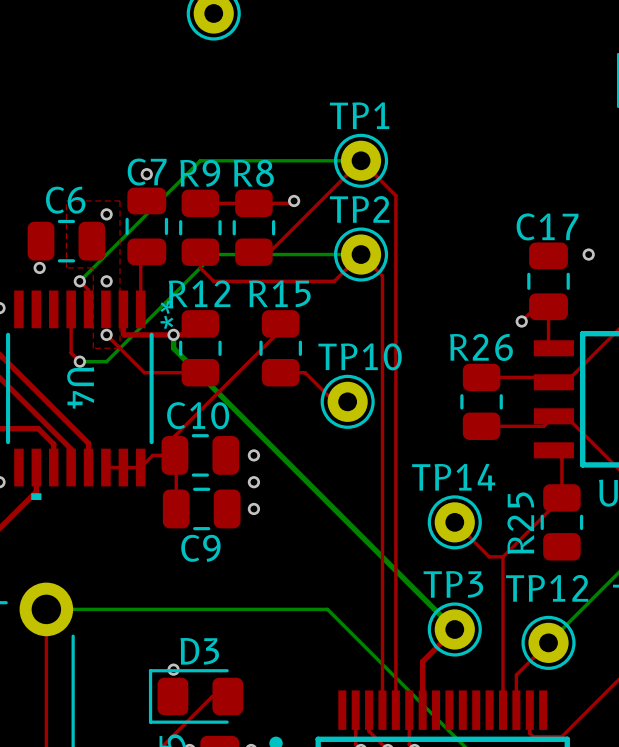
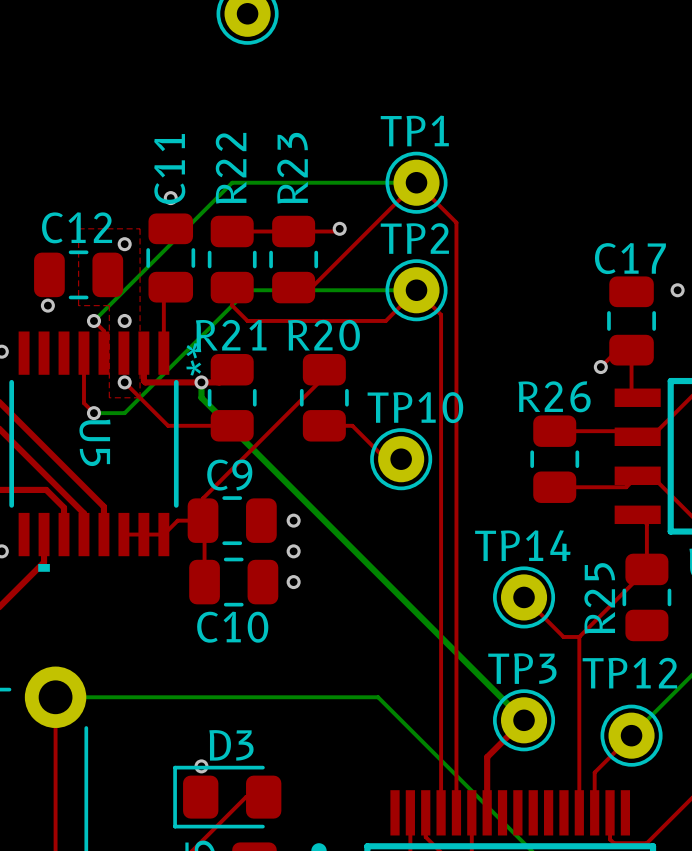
C7 name: C7 (147, 172) -> C11 (169, 169)
R9 name: R9 (200, 173) -> R22 (231, 168)
R8 name: R8 (253, 173) -> R23 (292, 168)
C6 name: C6 (65, 200) -> C12 (77, 227)
R12 name: R12 (199, 293) -> R21 (231, 335)
R15 name: R15 (279, 293) -> R20 (324, 335)
U4 name: U4 (80, 388) -> U5 (94, 442)
C10 name: C10 (198, 415) -> C9 (229, 475)
C9 name: C9 (200, 548) -> C10 (232, 627)

